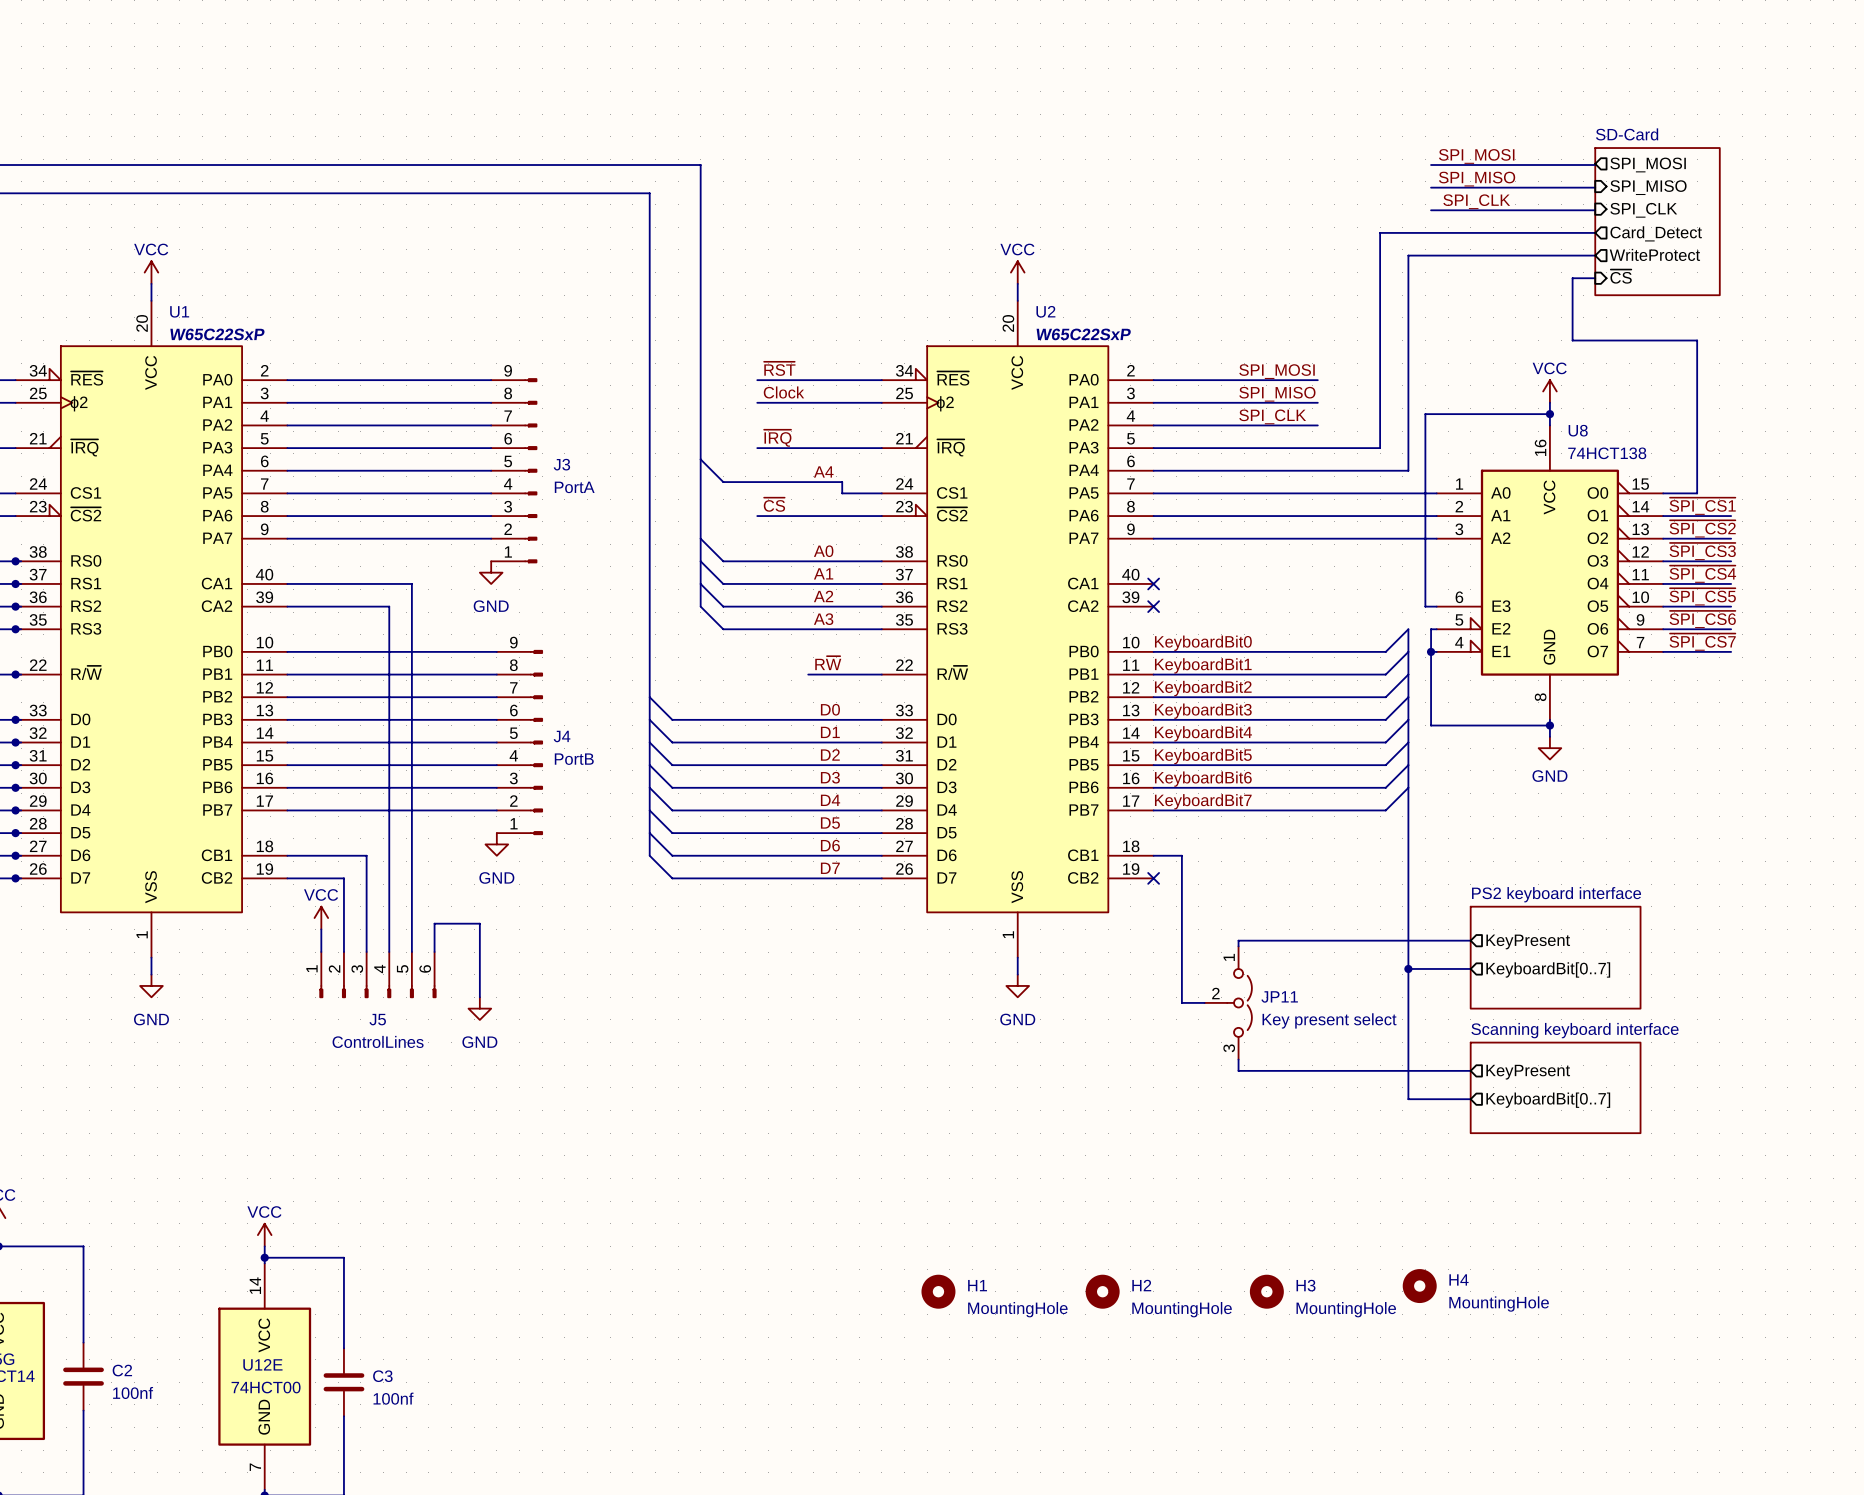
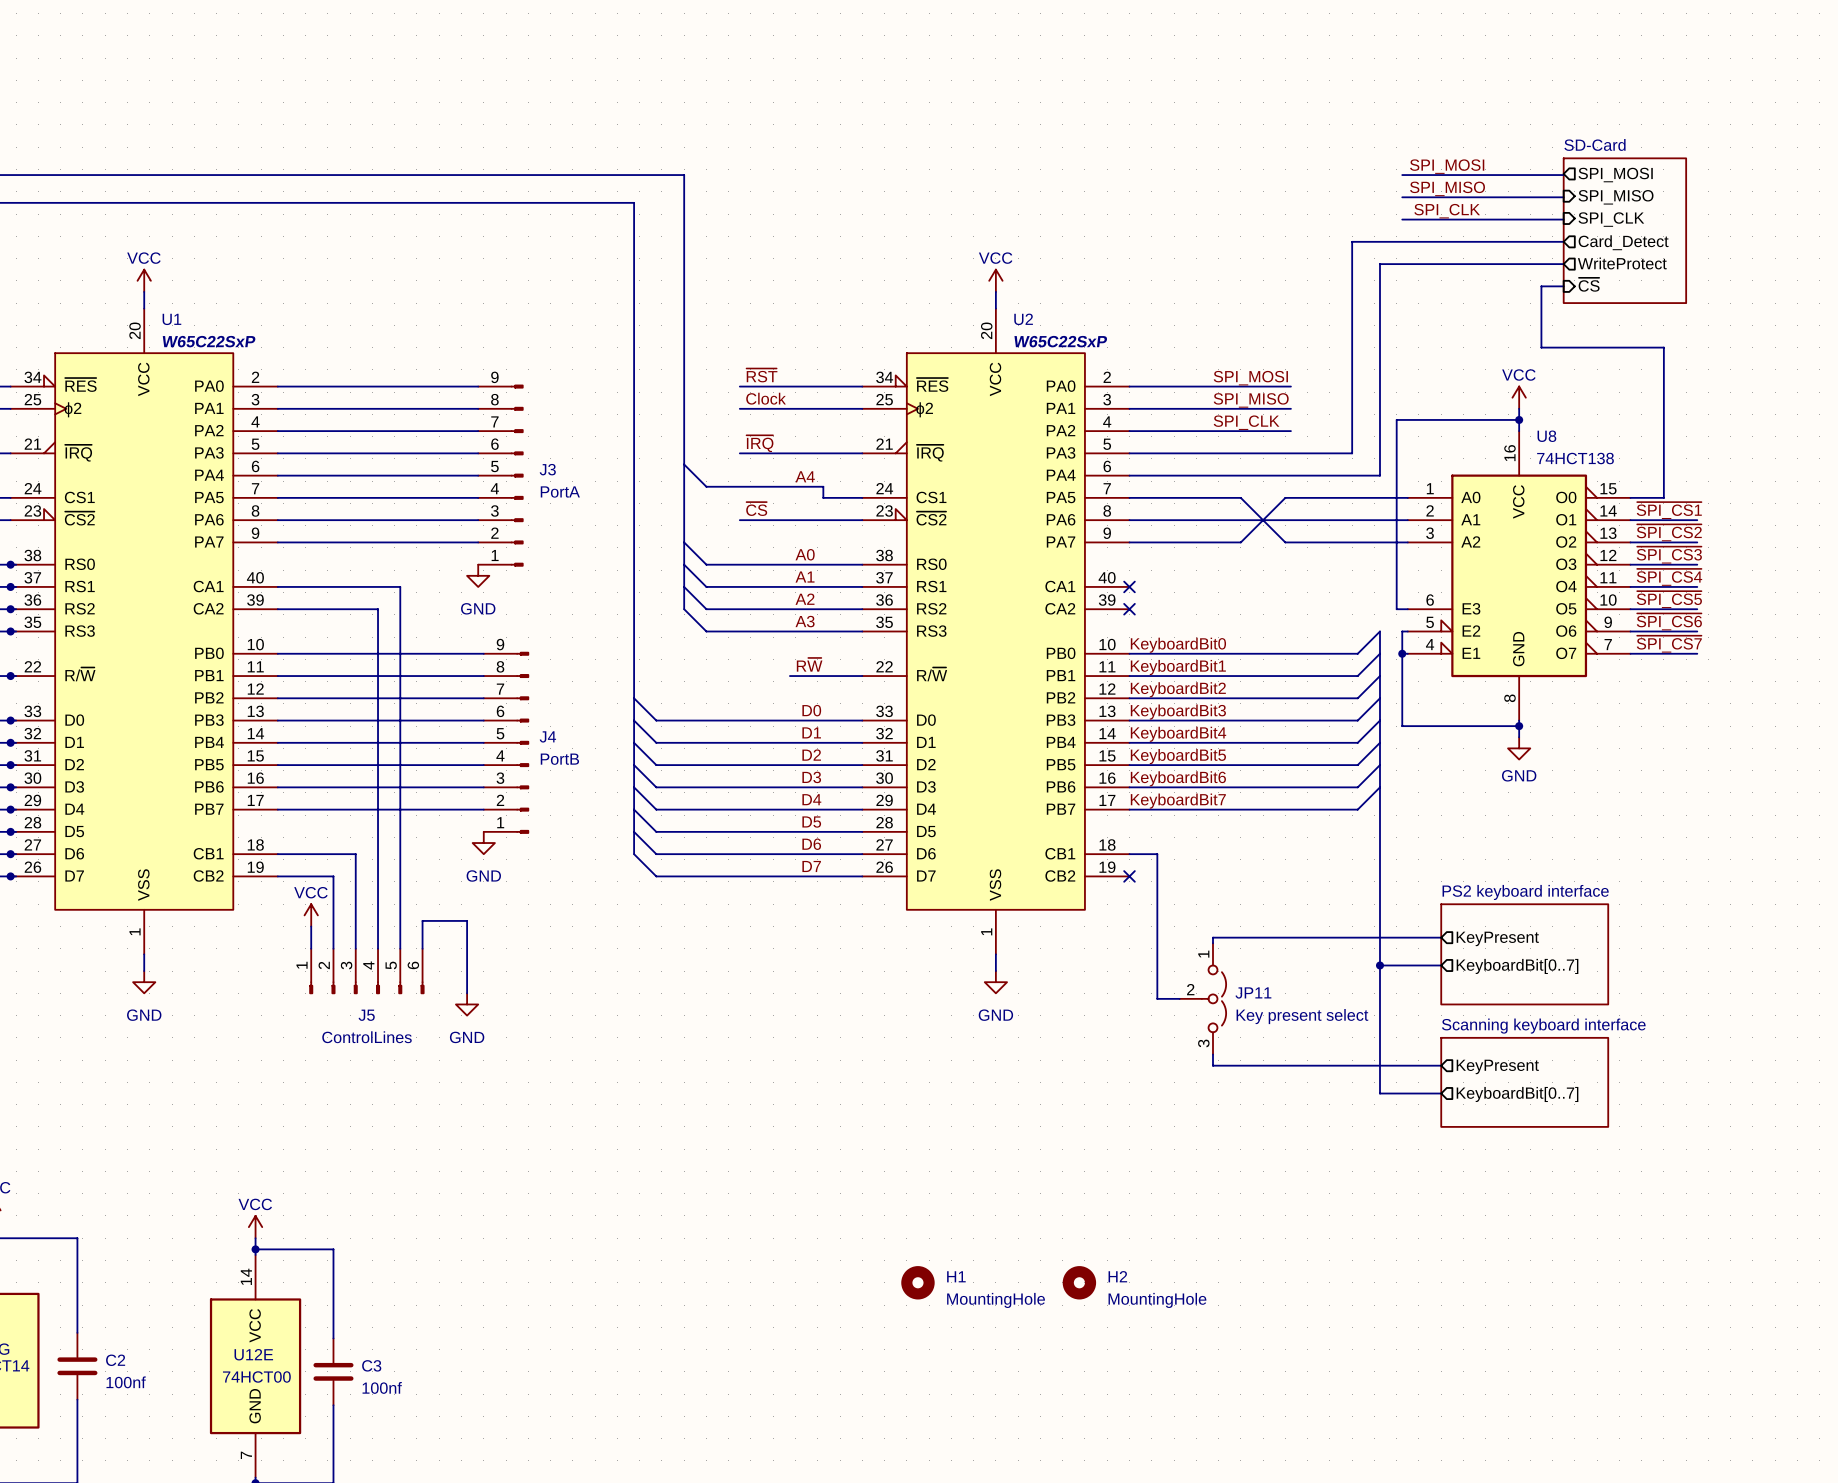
wire: (1266, 493) (1312, 493) -> (1240, 497) (1285, 542)
wire: (1266, 538) (1312, 538) -> (1240, 542) (1285, 497)
H4: MountingHole (1419, 1286) -> none
H3: MountingHole (1266, 1291) -> none

